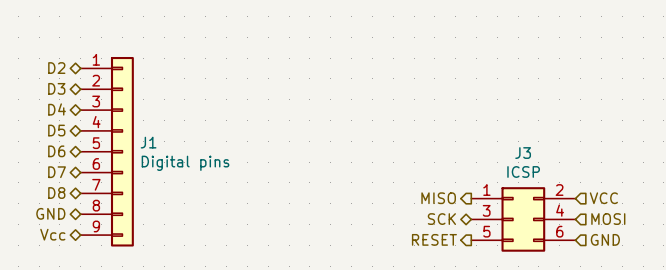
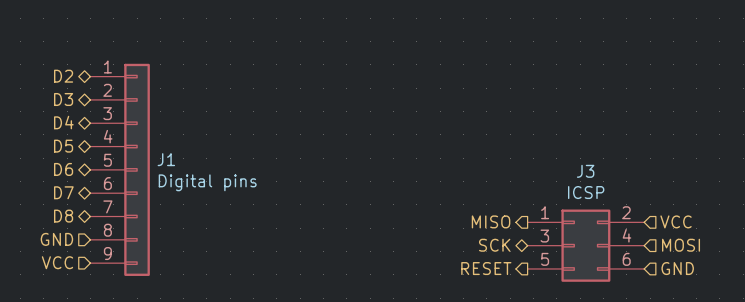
hierarchical label shape: bidirectional (50, 213) -> input (56, 239)
hierarchical label shape: bidirectional (52, 234) -> input (57, 262)
hierarchical label: Vcc (52, 234) -> VCC (57, 262)

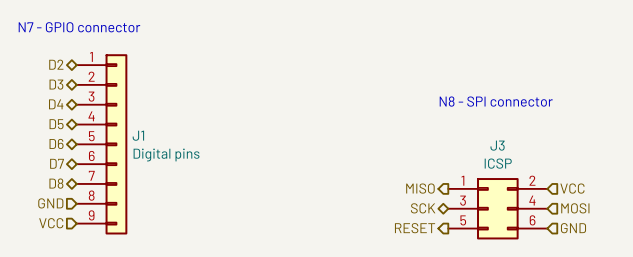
text: none -> N7 - GPIO connector (79, 27)
text: none -> N8 - SPI connector (496, 101)

